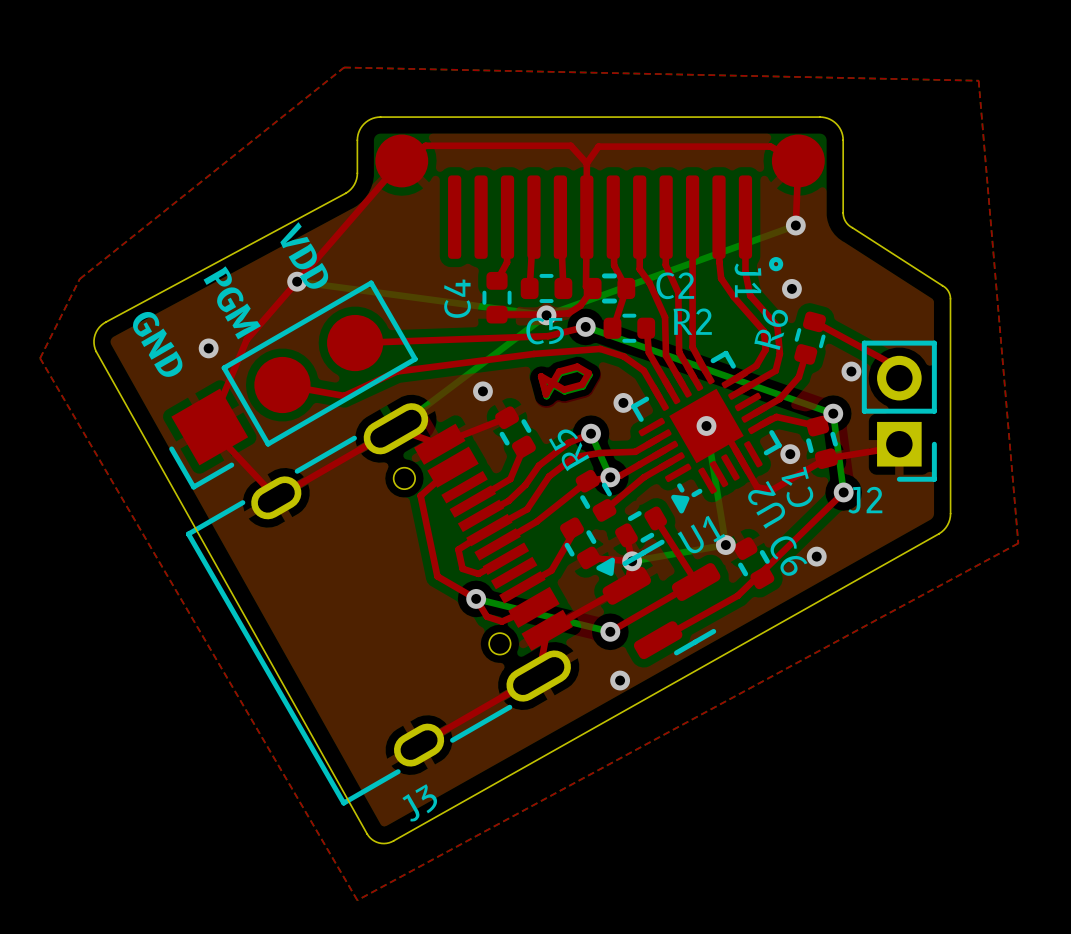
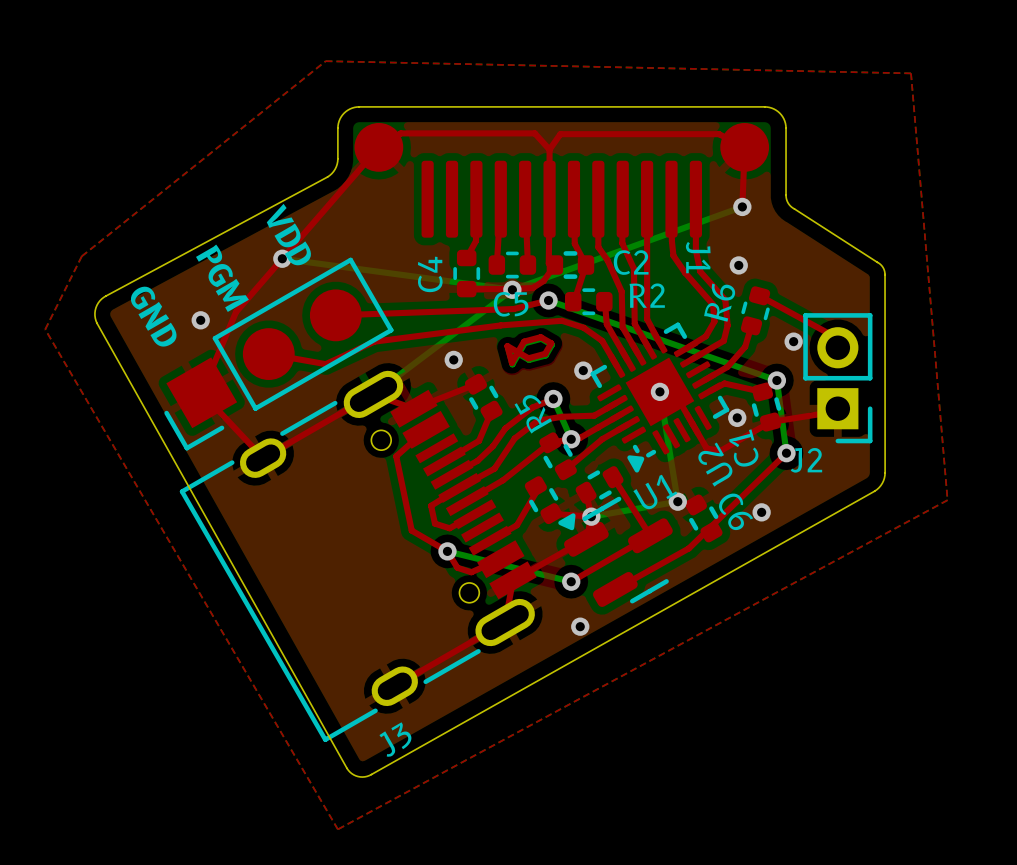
drawing: [768, 257, 784, 272] -> none

